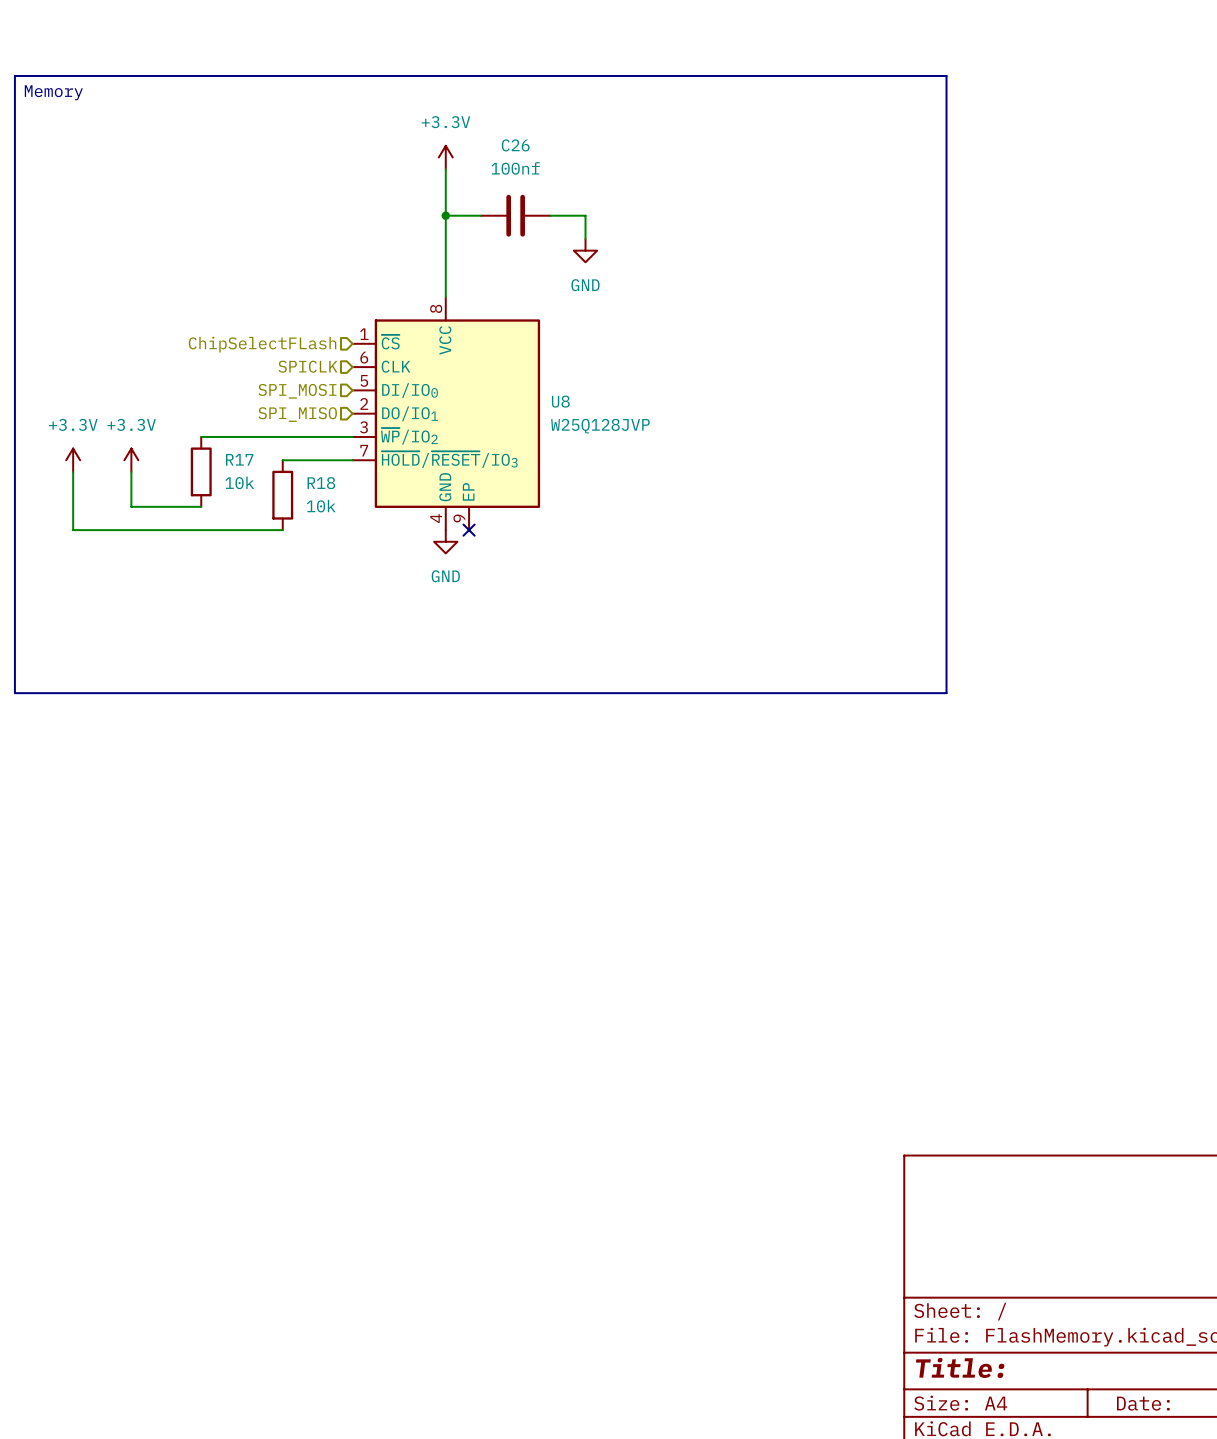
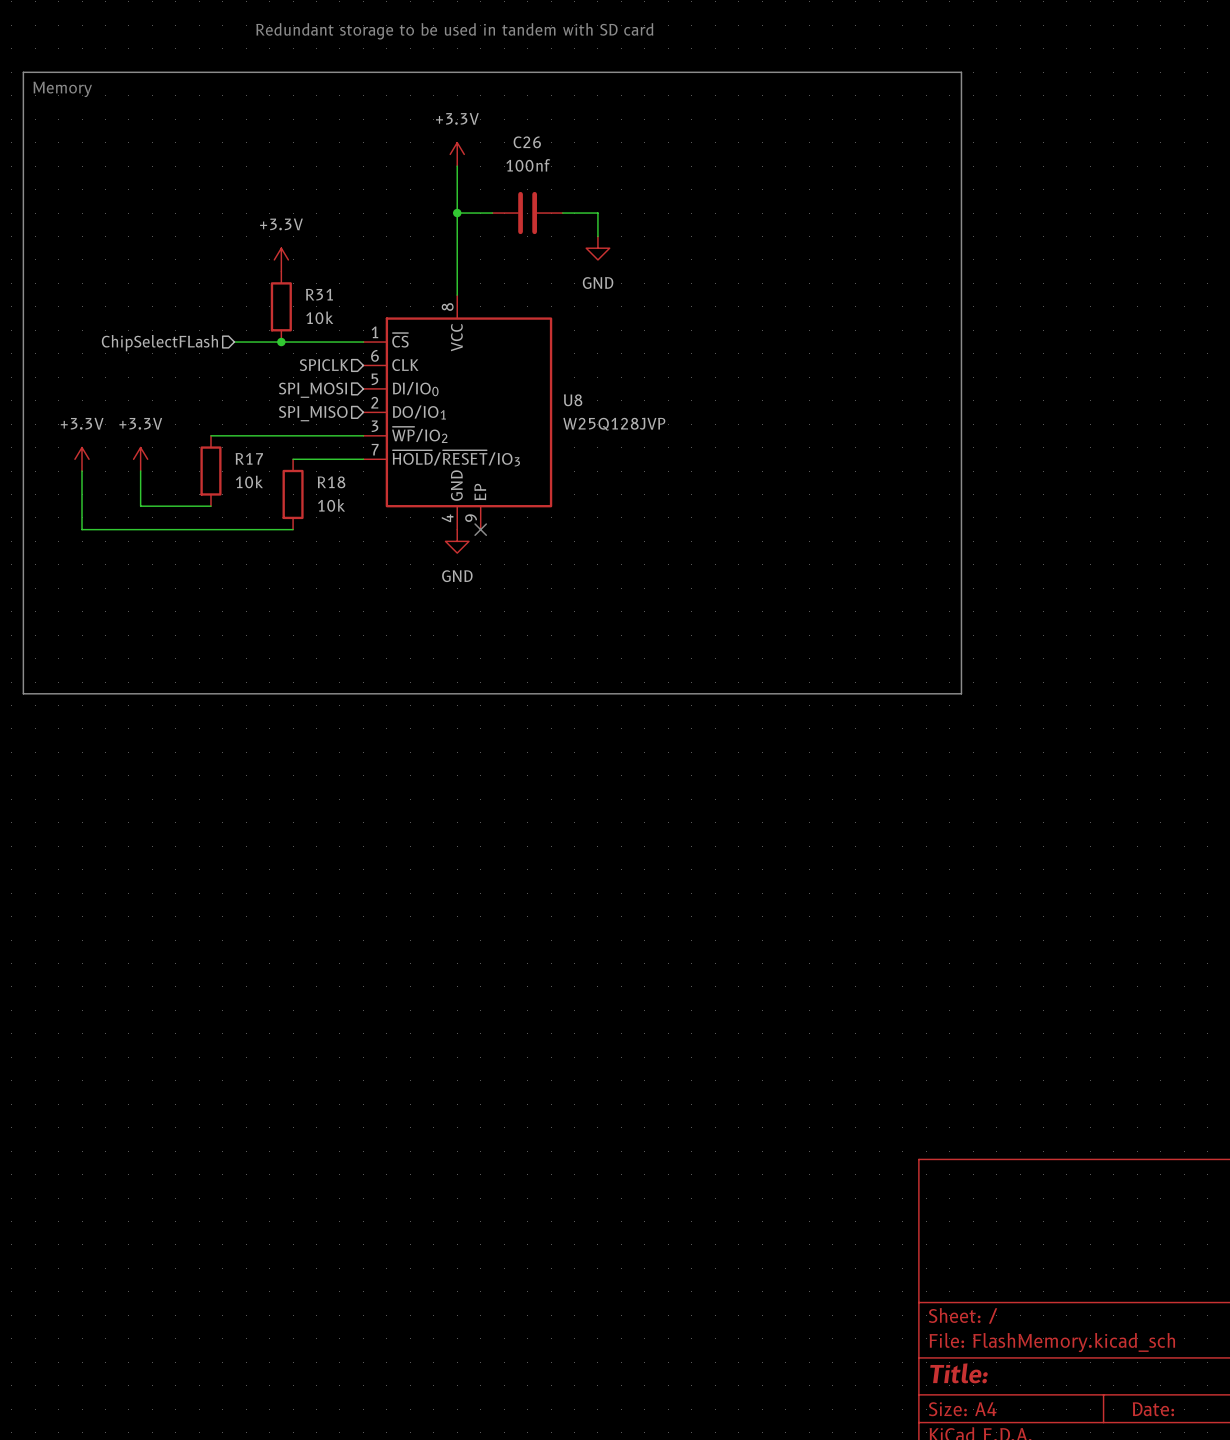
text: none -> Redundant storage to be used in tandem with SD card (454, 31)
power symbol: none -> +3.3V (281, 259)
R31: none -> 10k (281, 306)
wire: none -> (234, 342) (363, 342)
junction: none -> (281, 342)
hierarchical label position: ChipSelectFLash (262, 344) -> ChipSelectFLash (159, 343)

